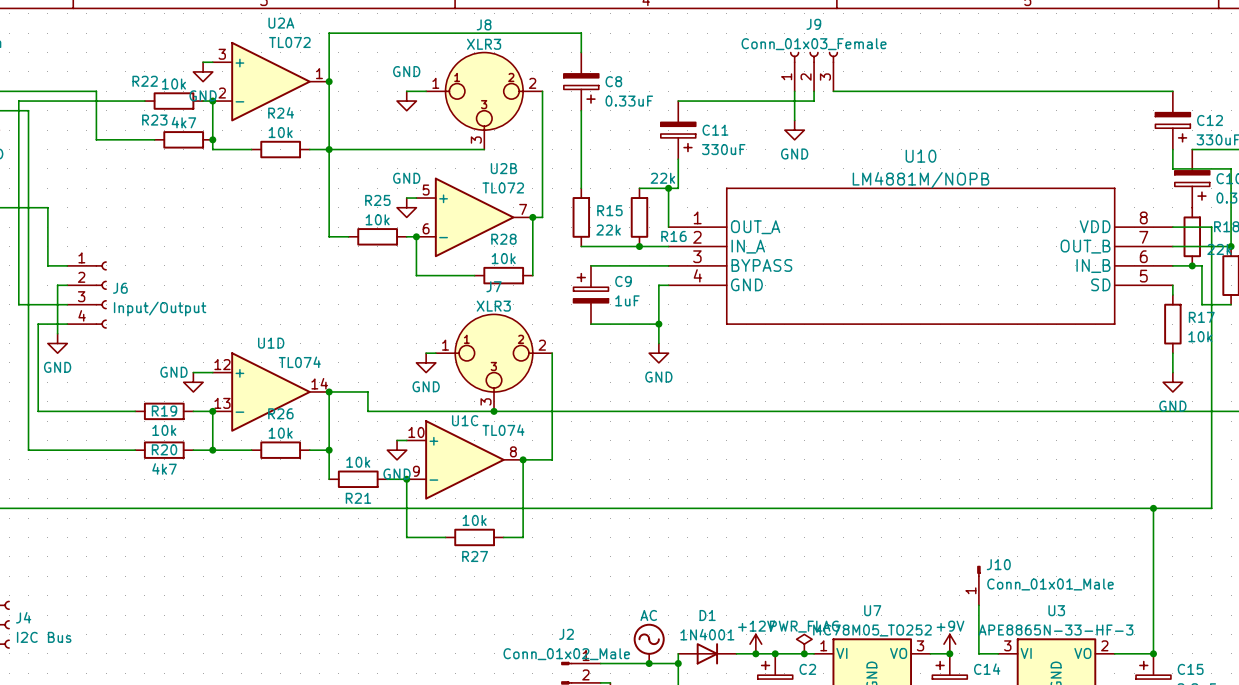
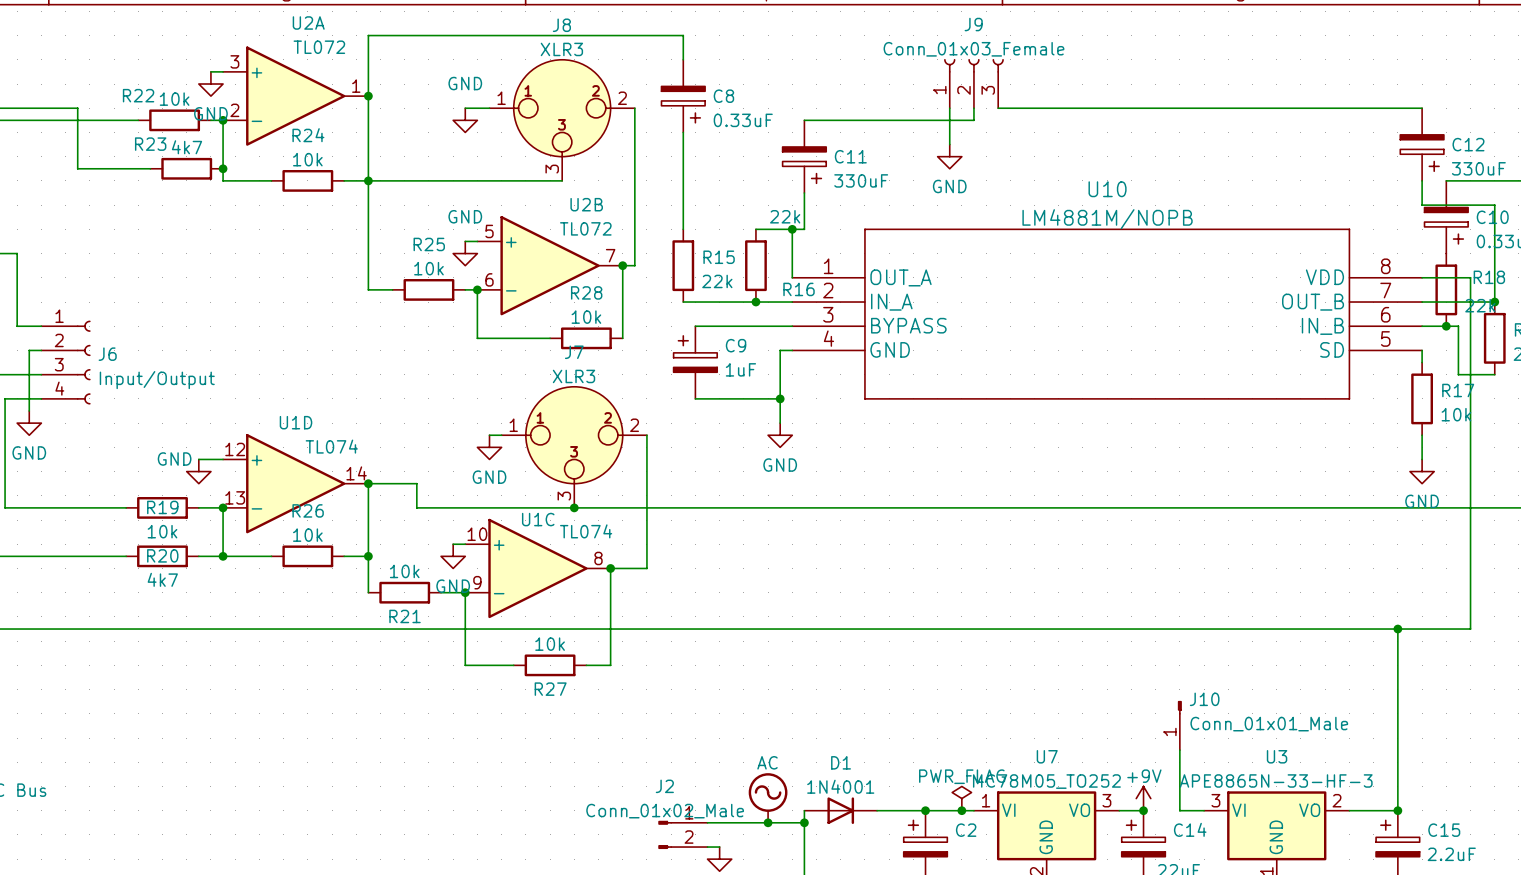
power symbol: +12V (755, 644) -> none
junction: (755, 653) -> none

